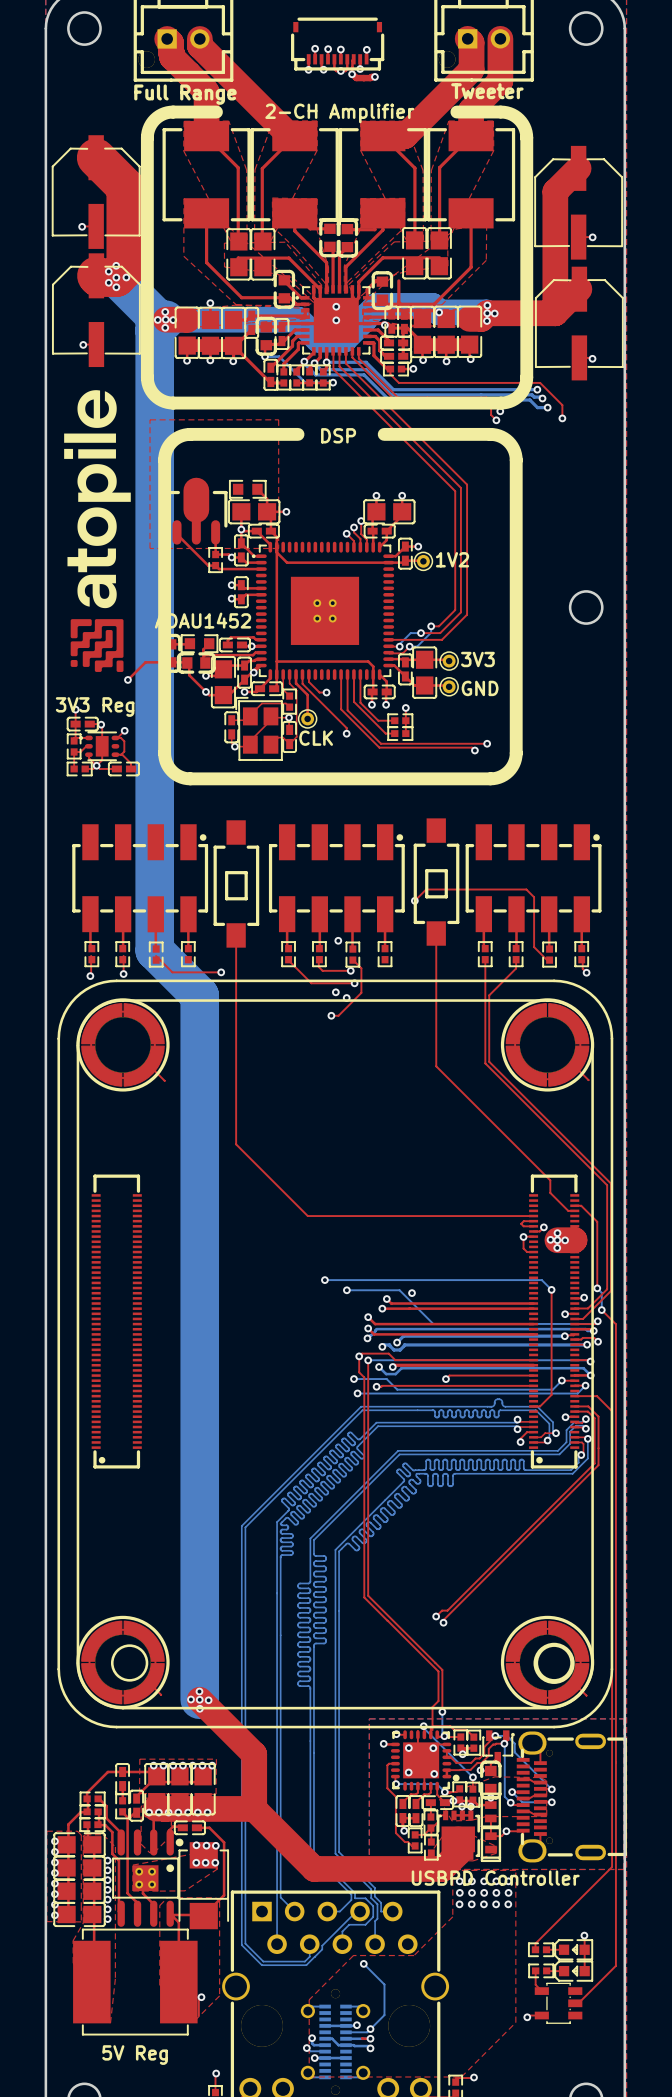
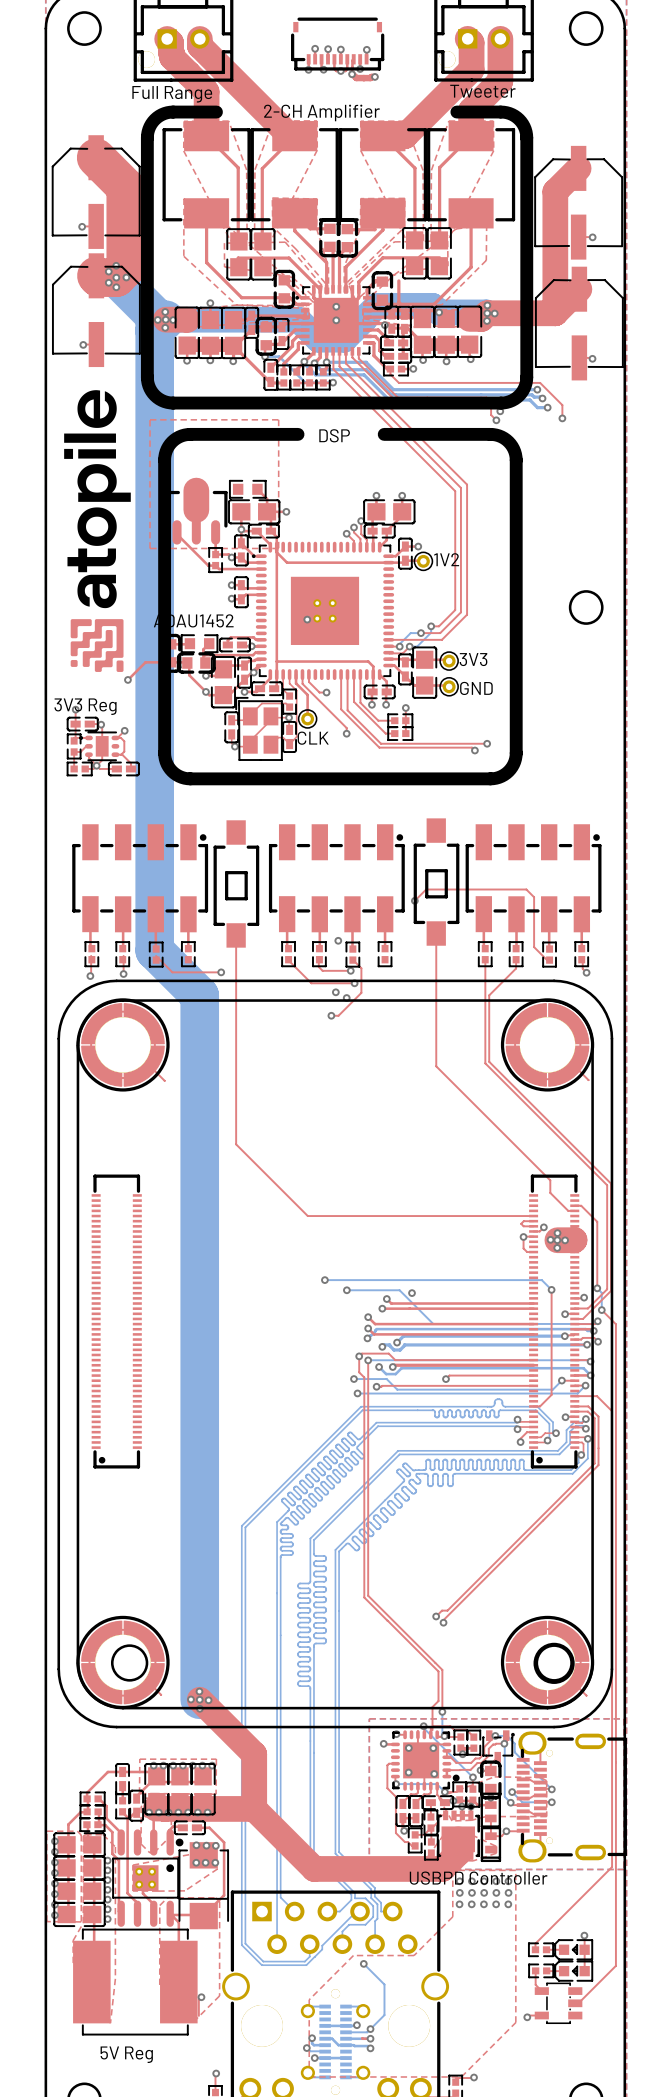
via: none -> (307, 619)

